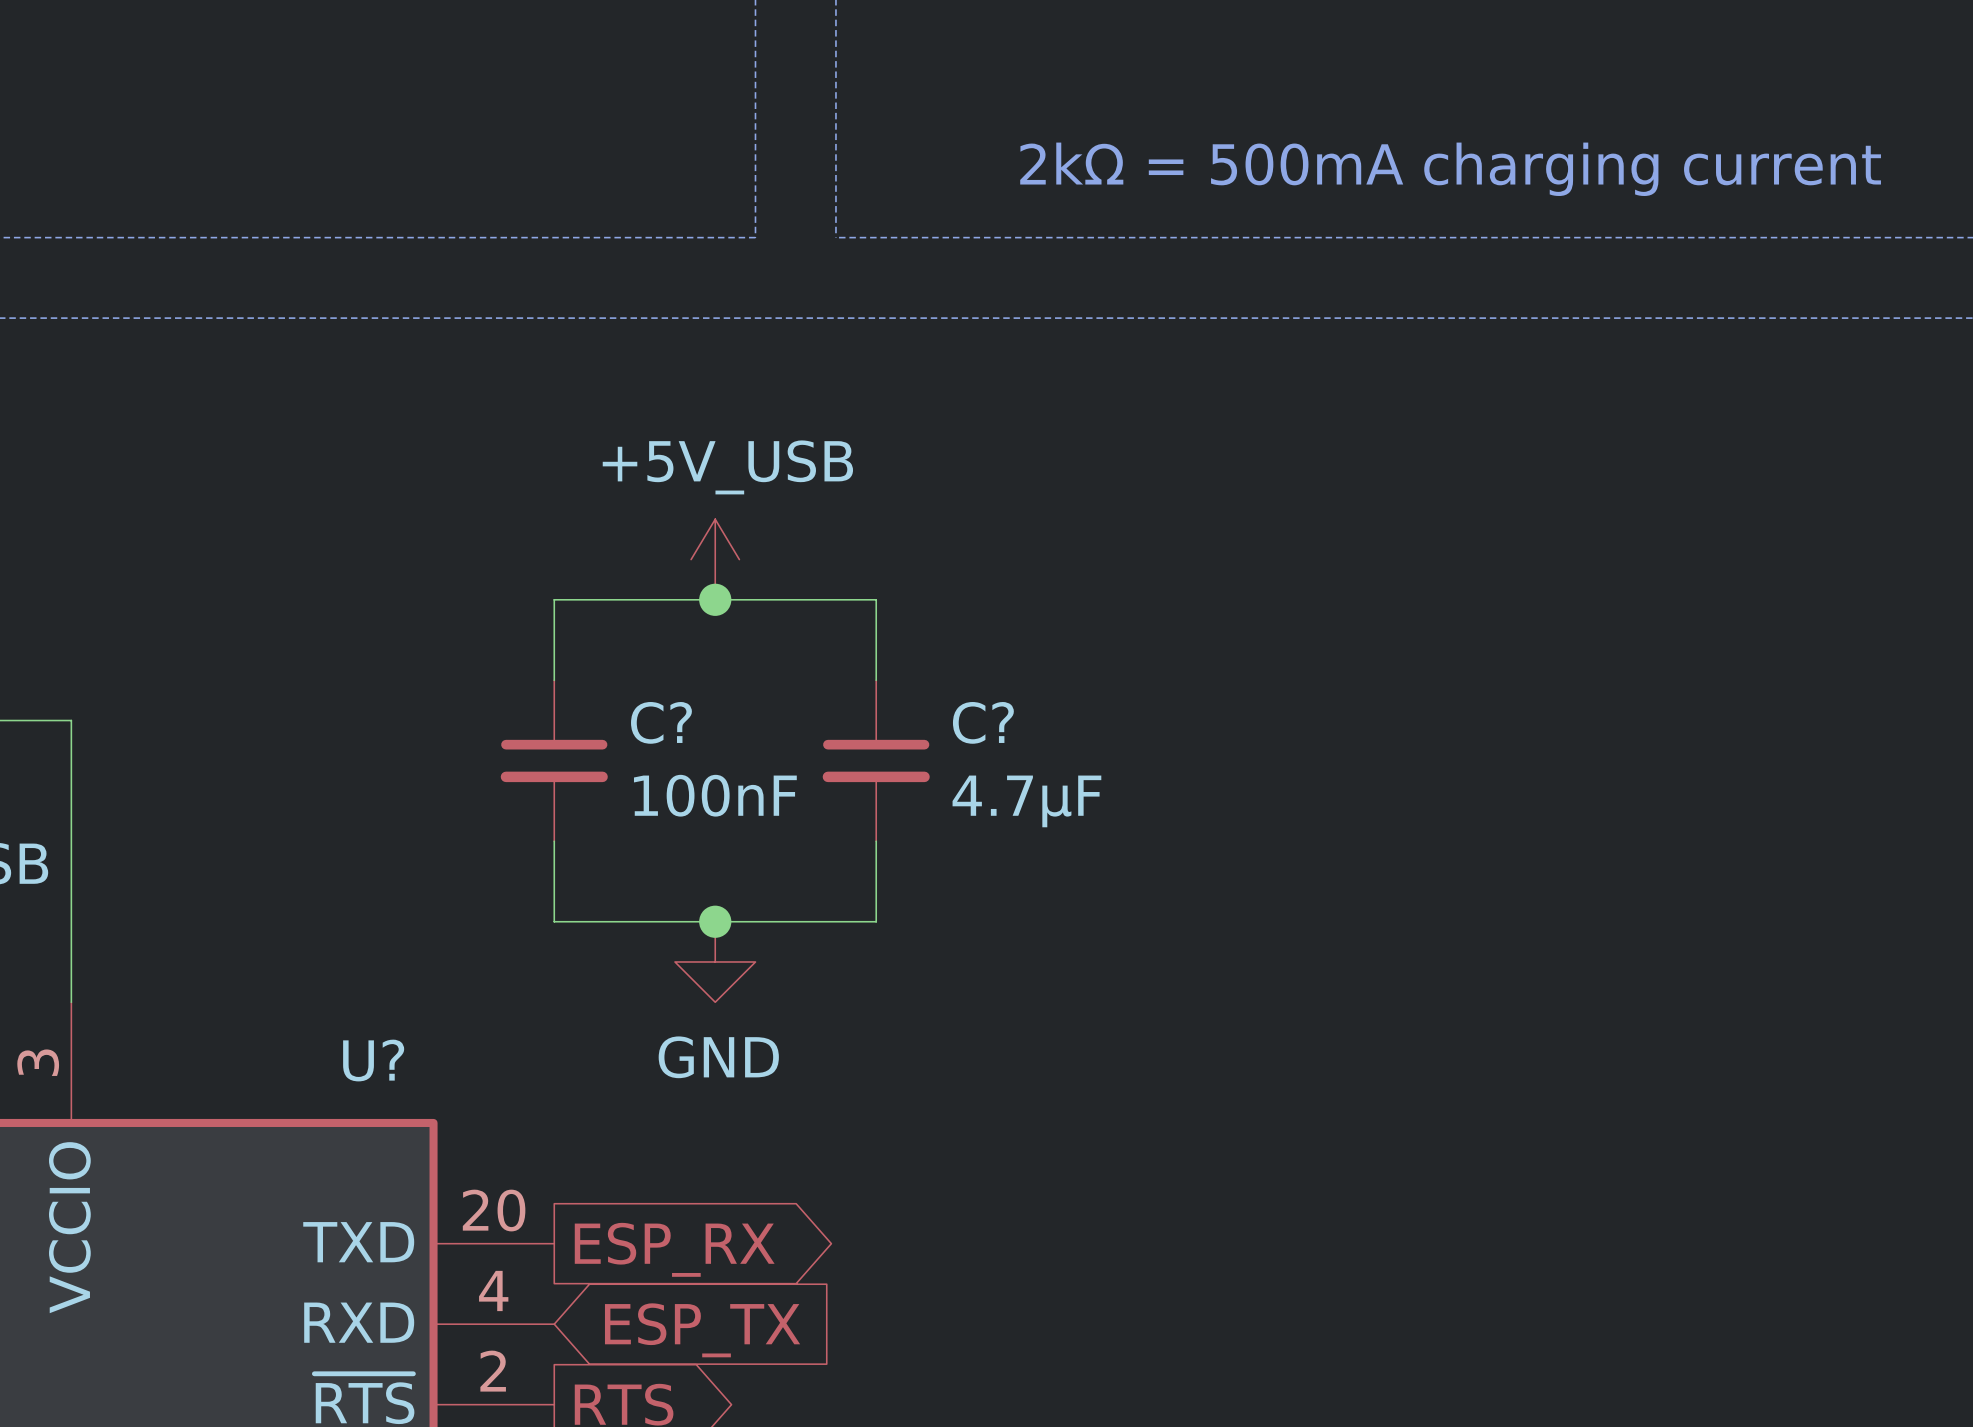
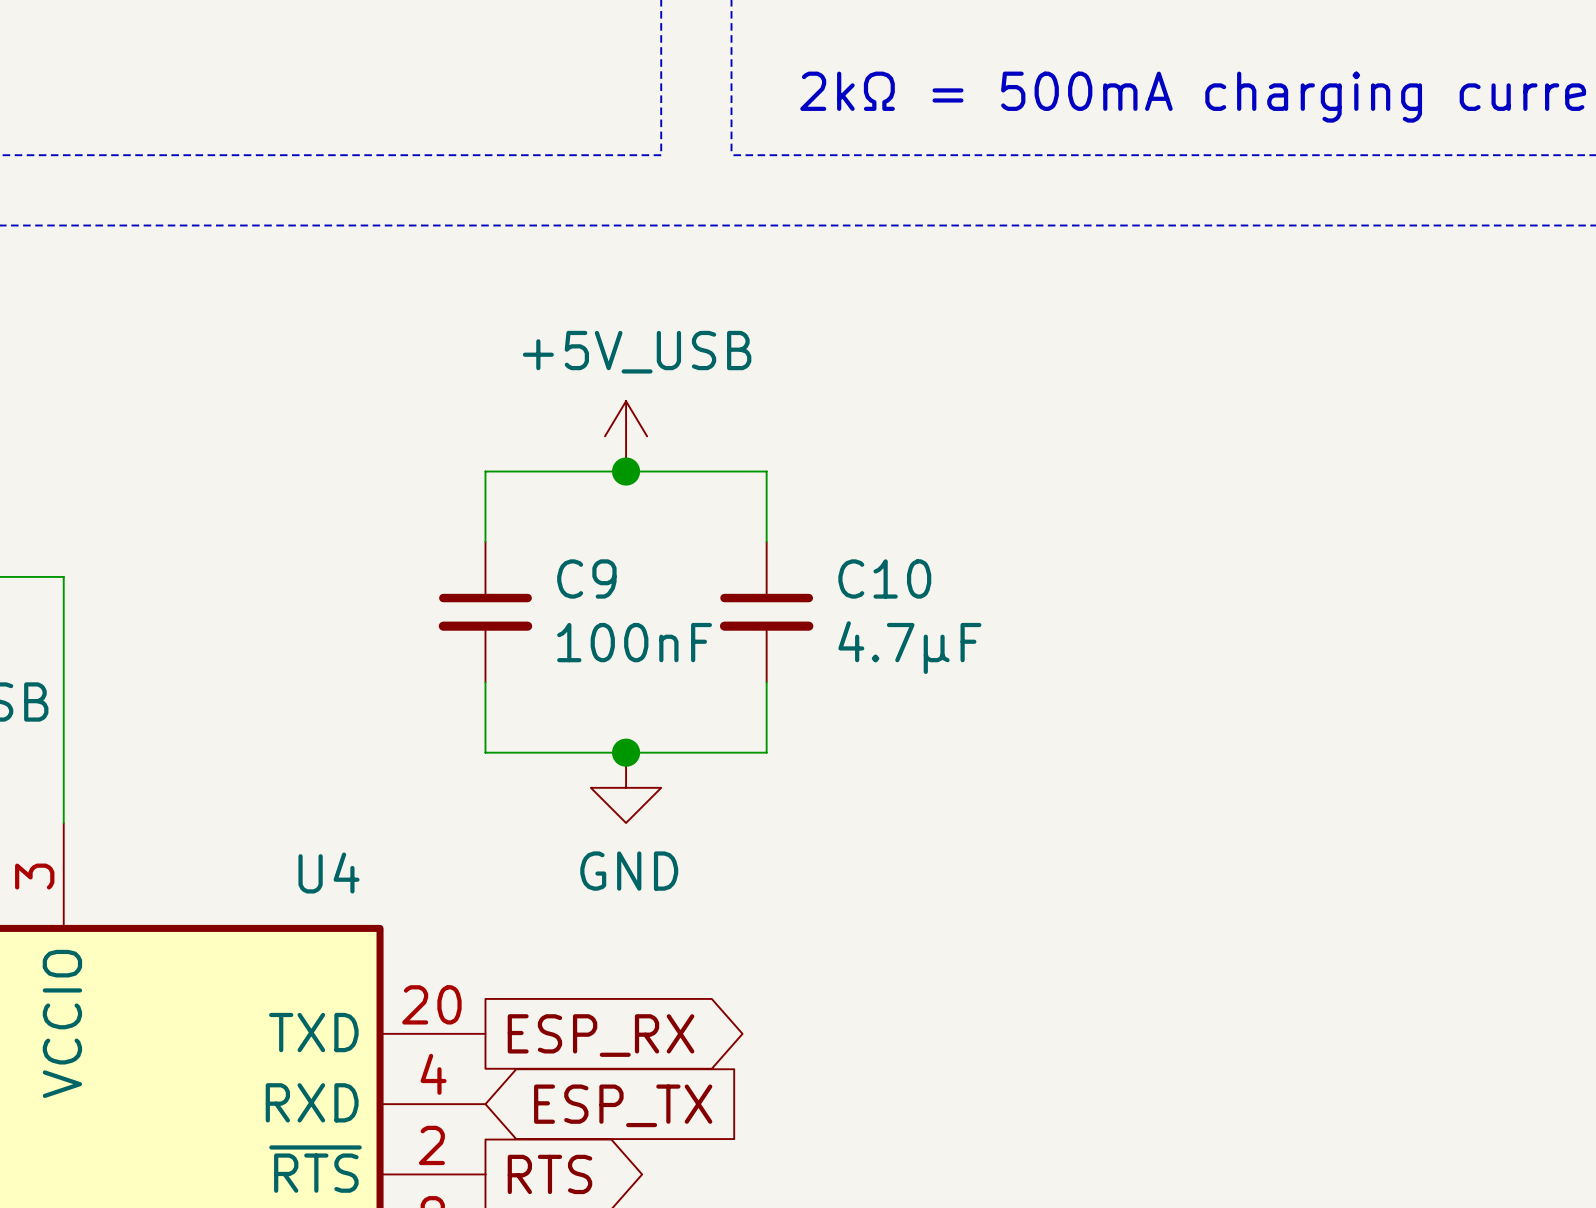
C? name: C? (661, 722) -> C9 (586, 578)
C? name: C? (983, 722) -> C10 (884, 578)
U? name: U? (373, 1060) -> U4 (329, 873)

